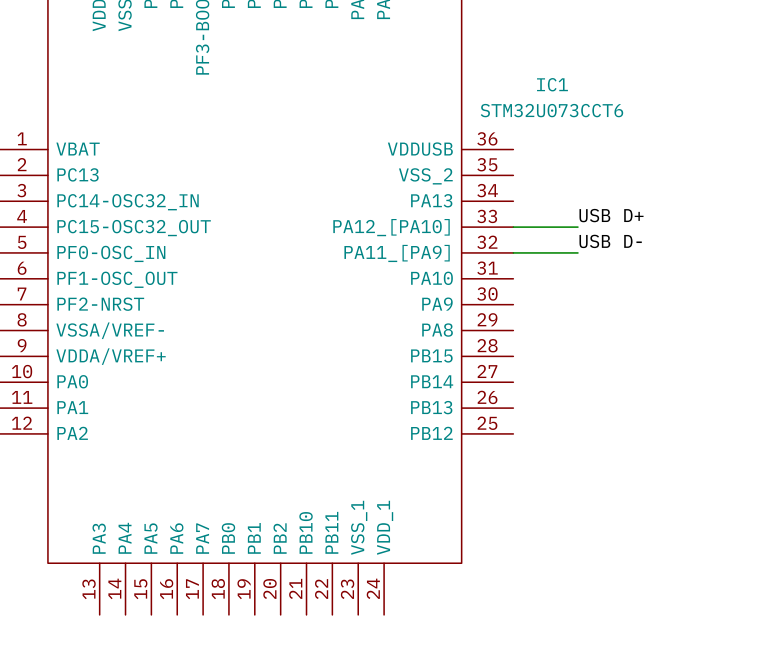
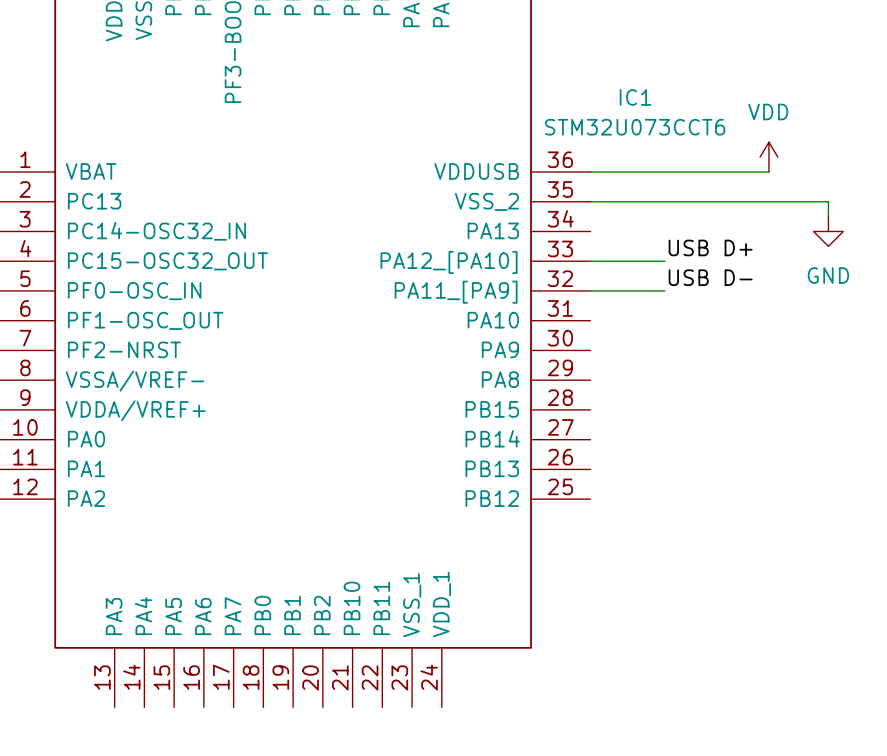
power symbol: none -> VDD (768, 157)
wire: none -> (590, 172) (768, 172)
wire: none -> (590, 201) (828, 201) (828, 216)
power symbol: none -> GND (828, 231)

